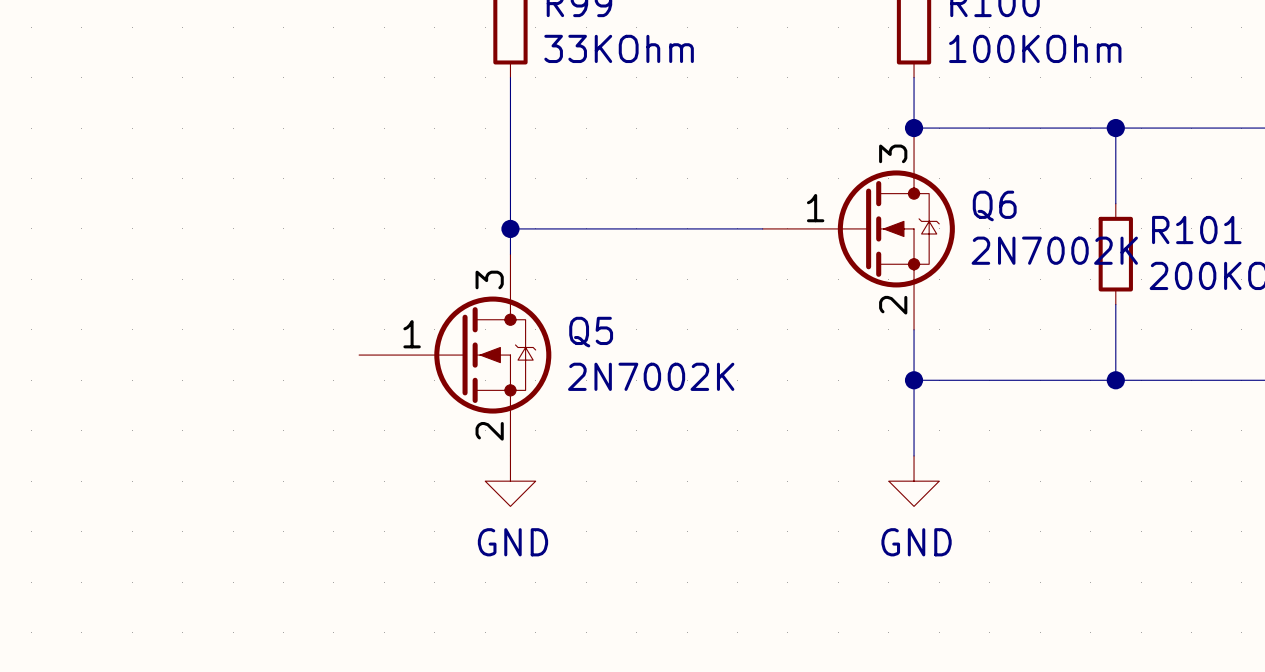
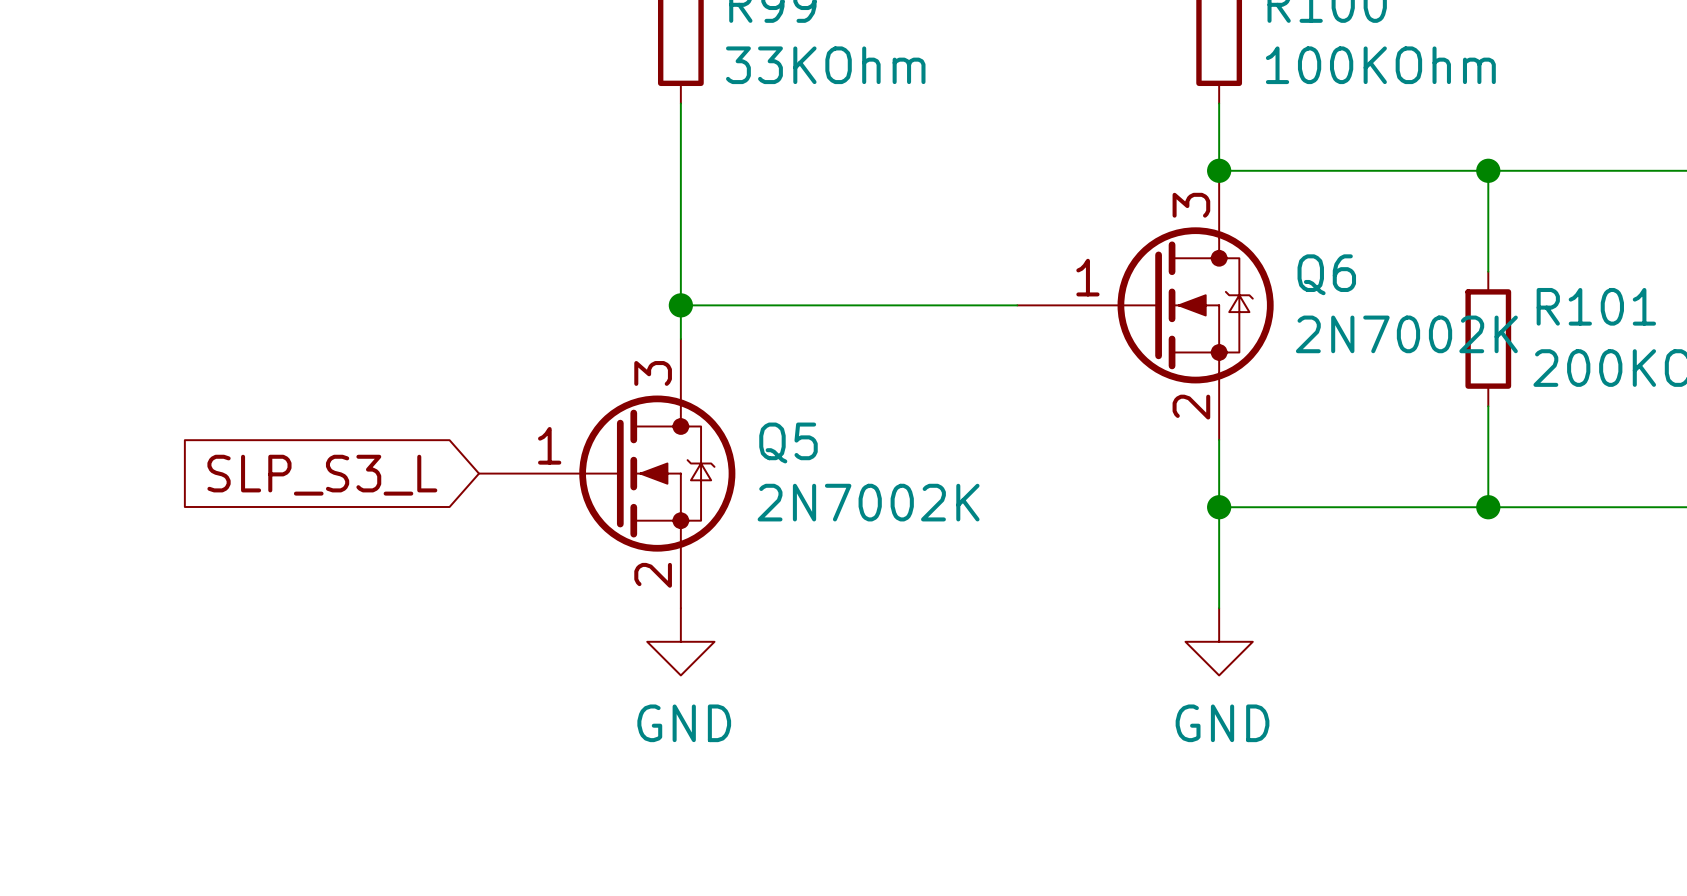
global label: none -> SLP_S3_L (322, 475)

